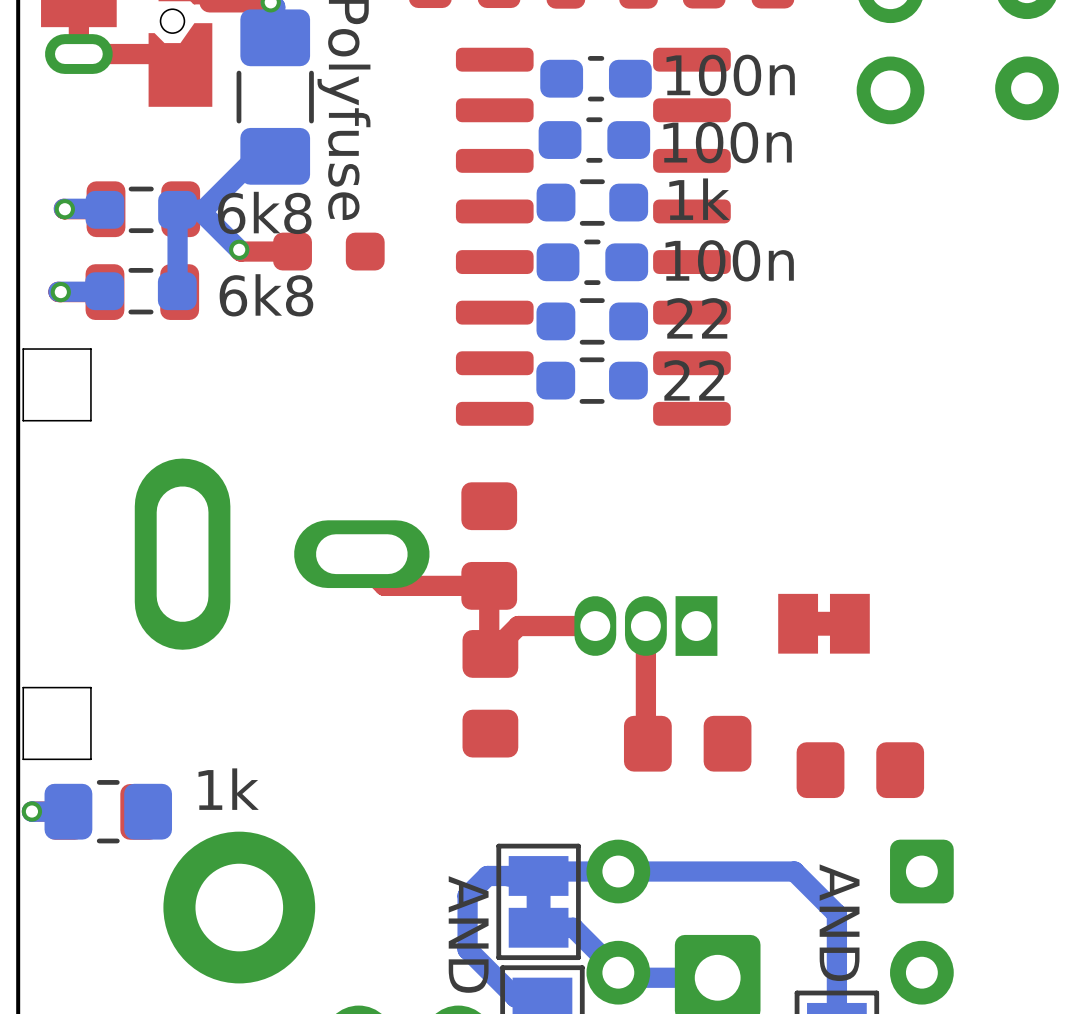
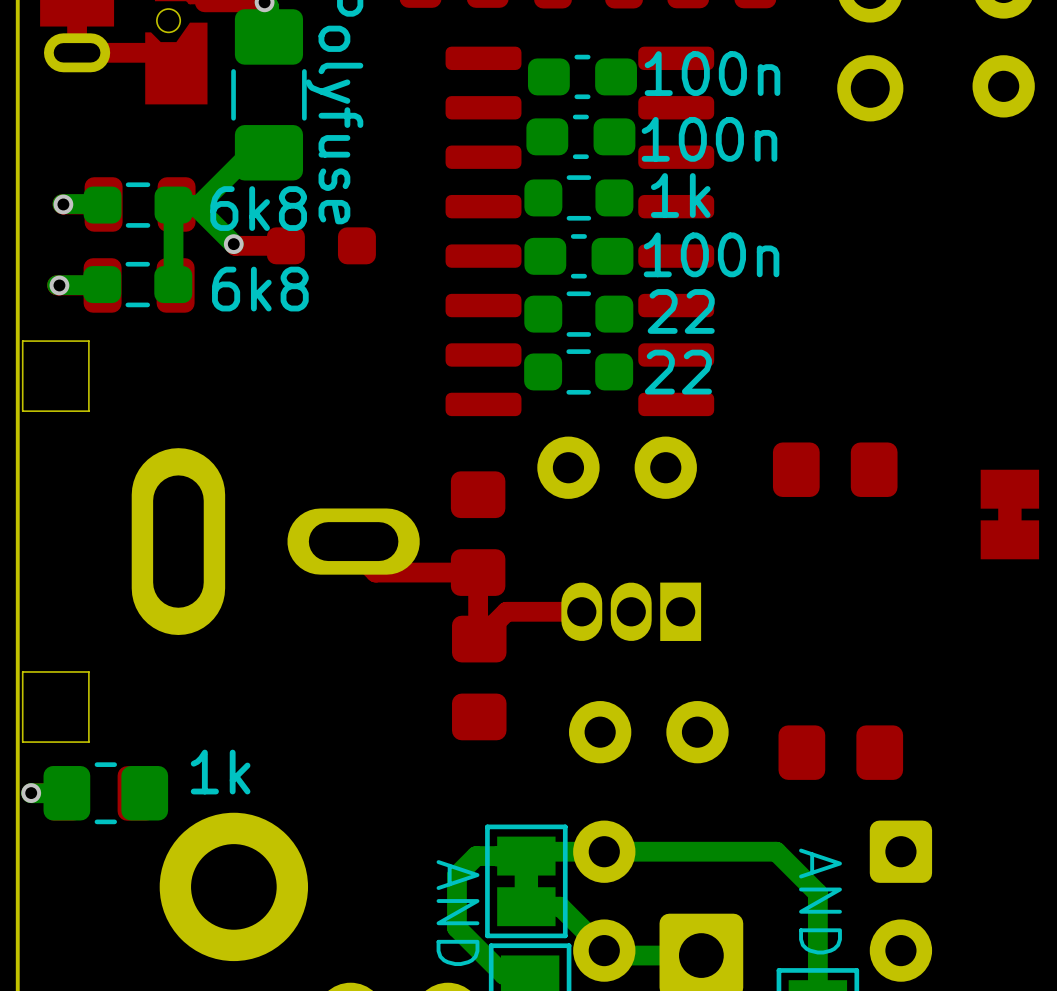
part: none -> (617, 467)
part: none -> (835, 469)
part rotation: 0° (824, 623) -> 90° clockwise (1009, 514)
part position: (824, 623) -> (1009, 514)
top track: (645, 626) (645, 737) (642, 741) -> none
part footprint: [623, 715, 752, 772] -> [569, 701, 729, 764]

